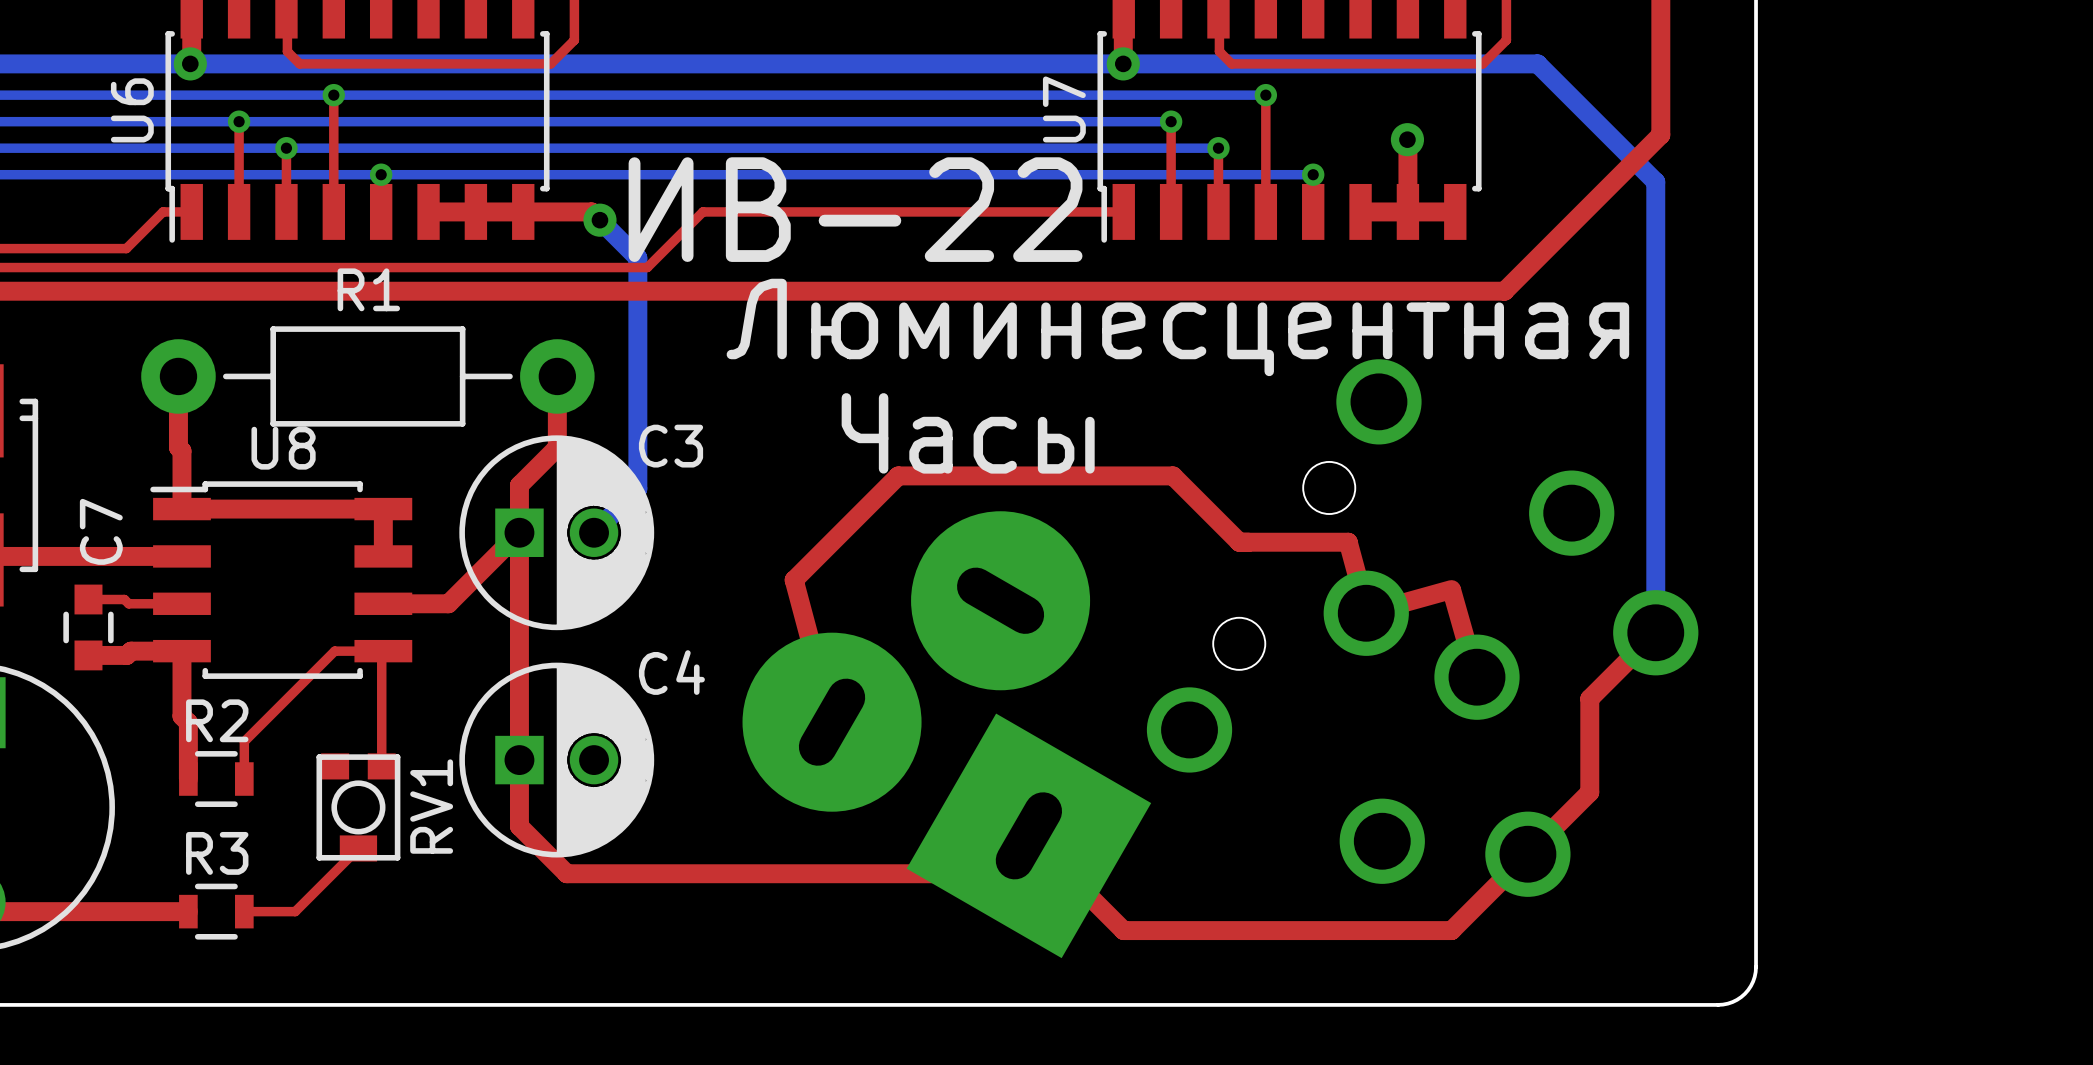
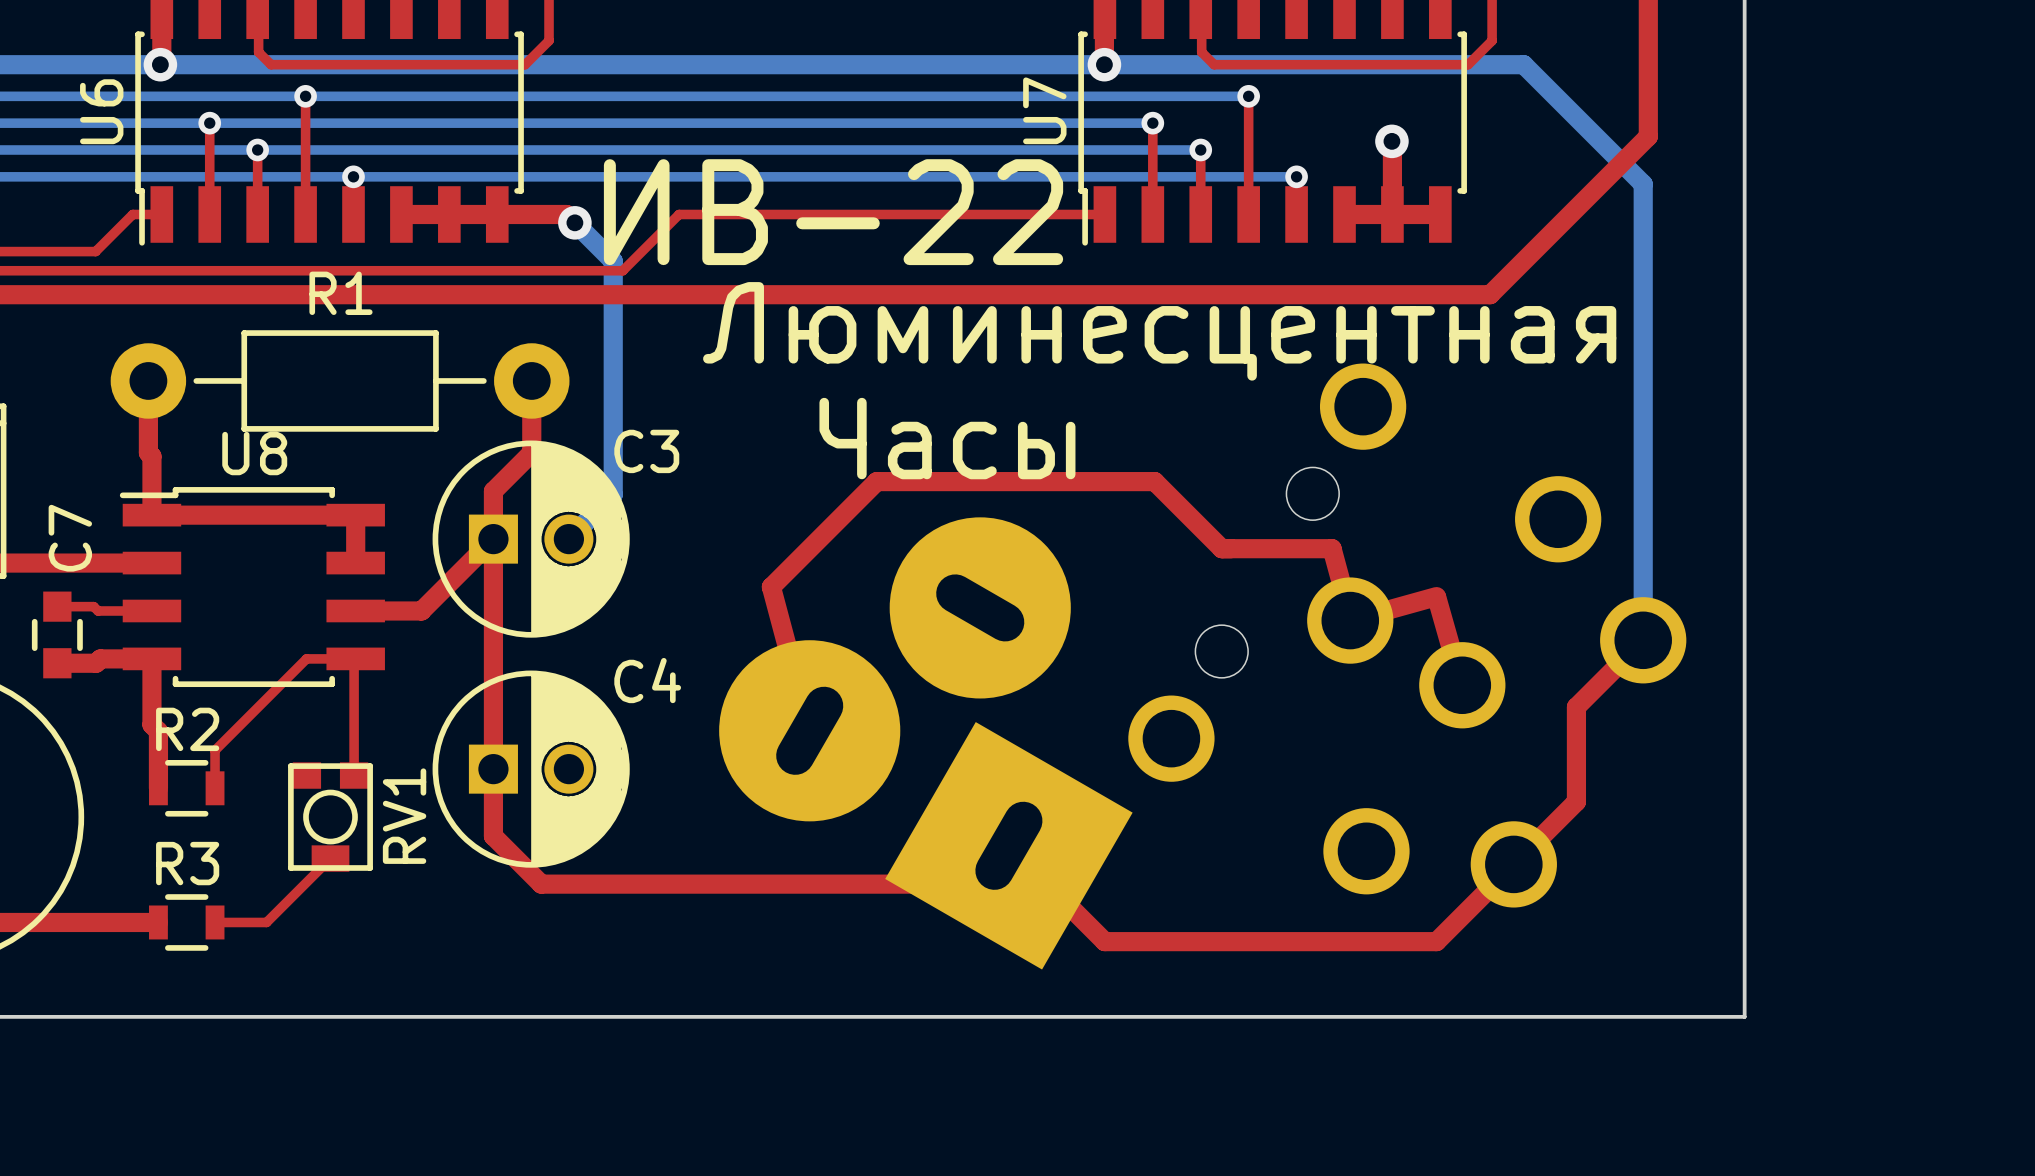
board edge: (1756, 967) (1753, 981) (1744, 993) (1732, 1002) (1718, 1004) -> (1744, 978) (1744, 1016) (1706, 1016)

